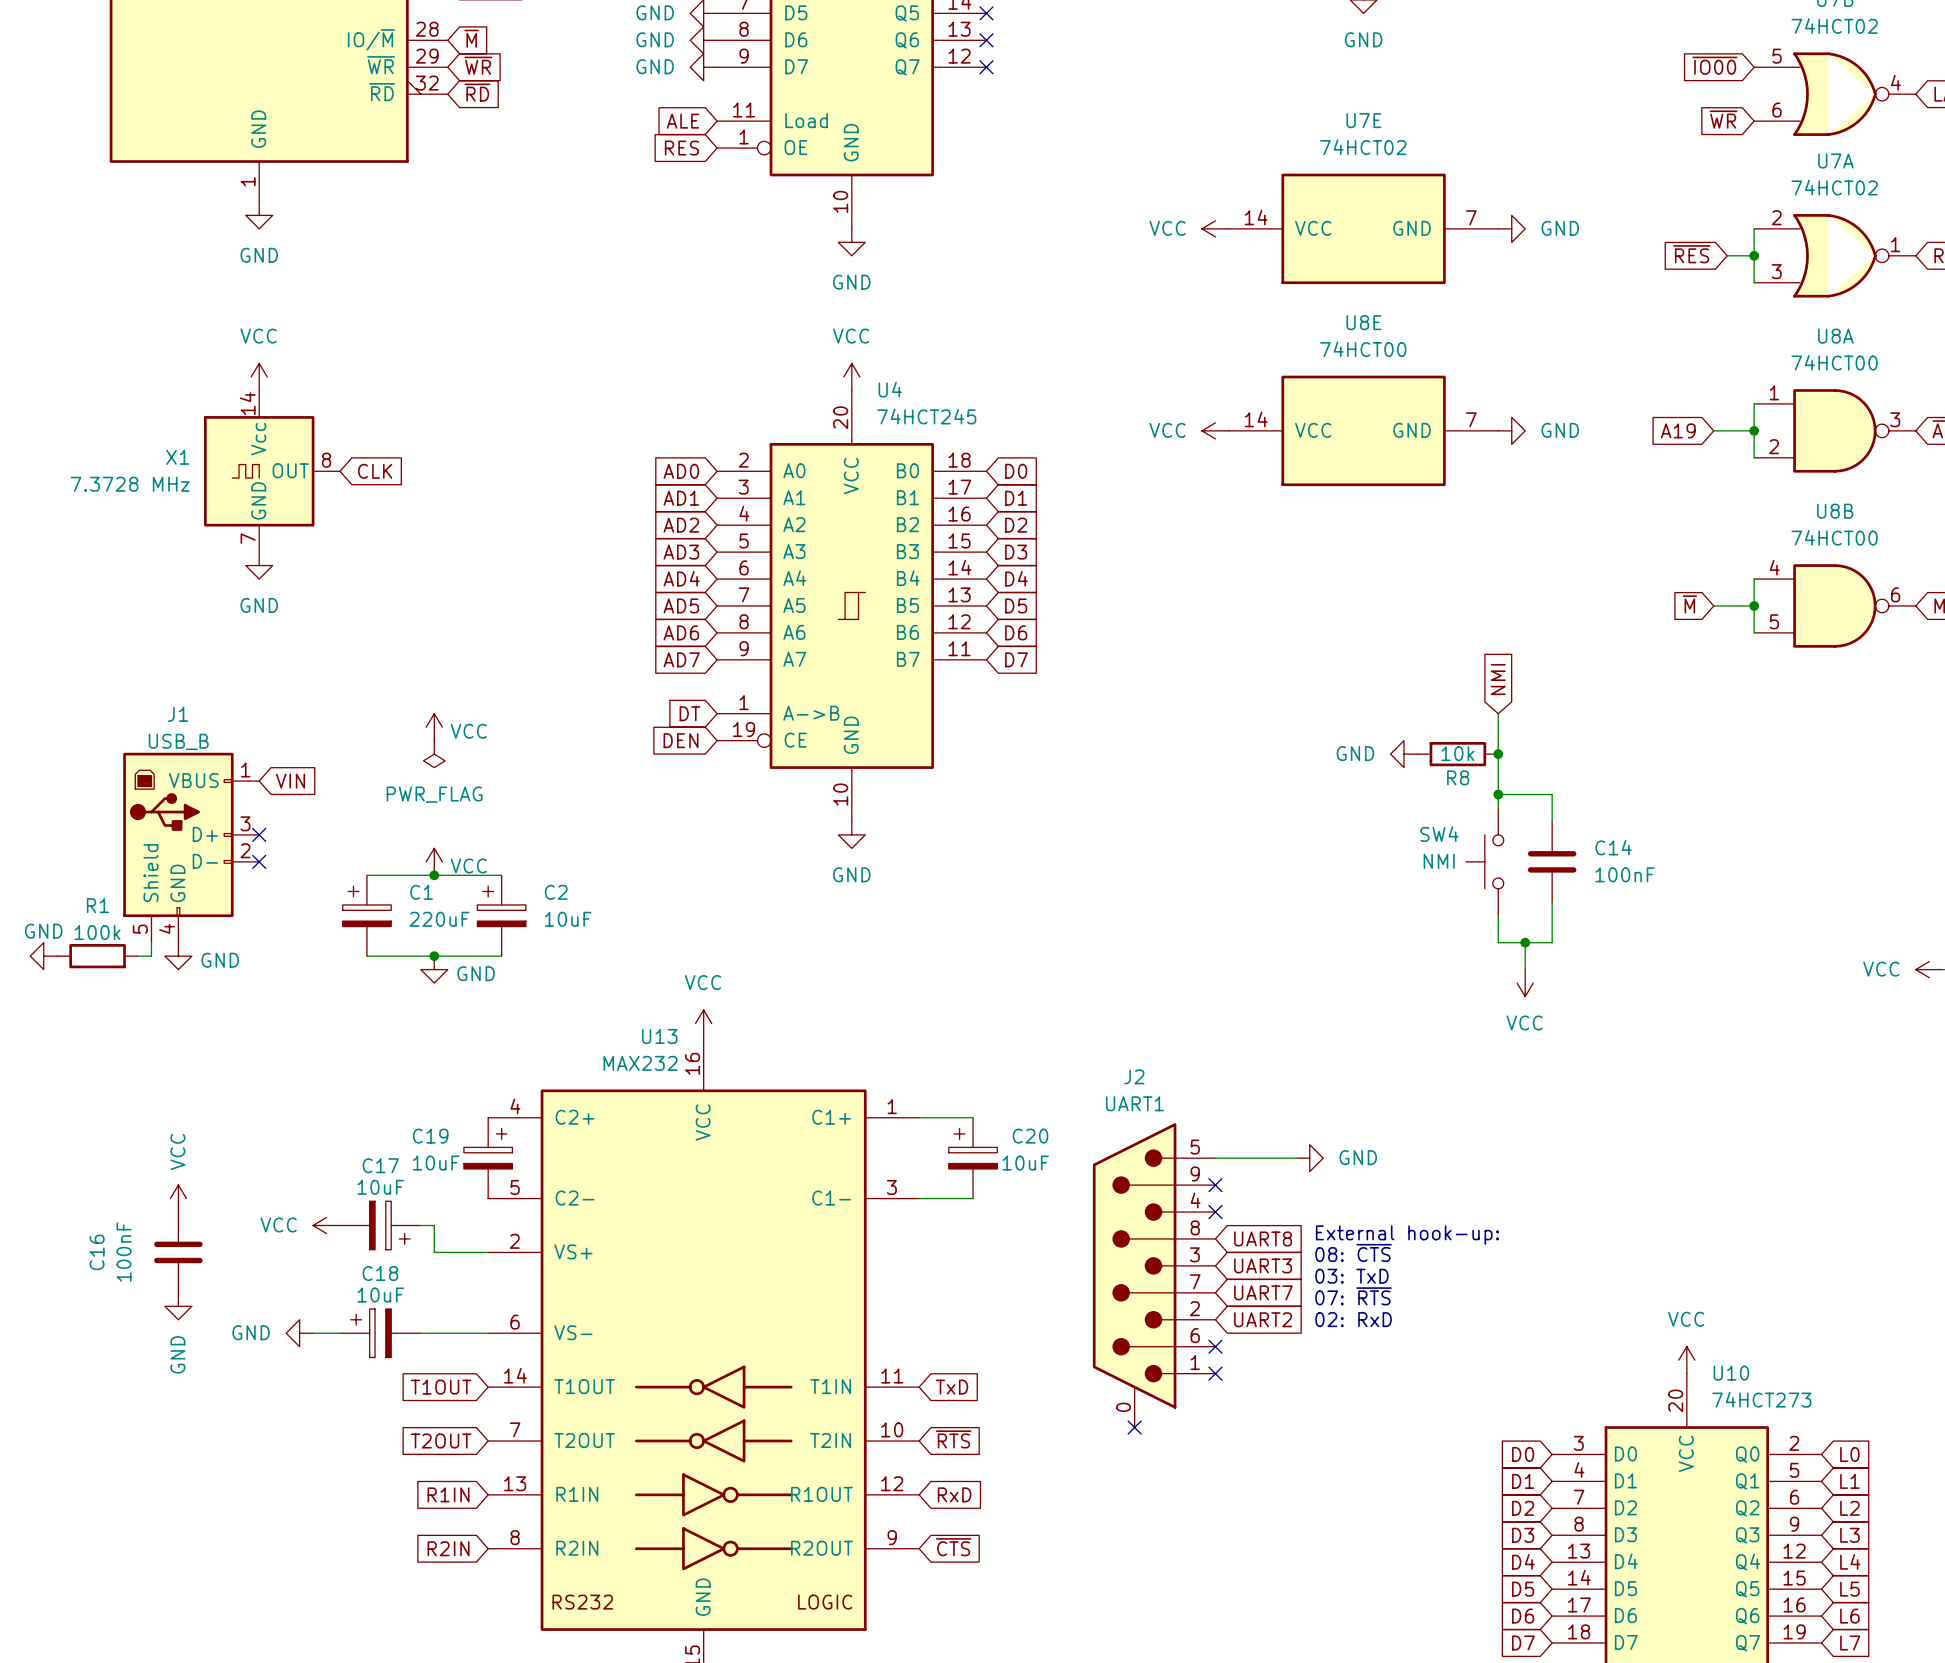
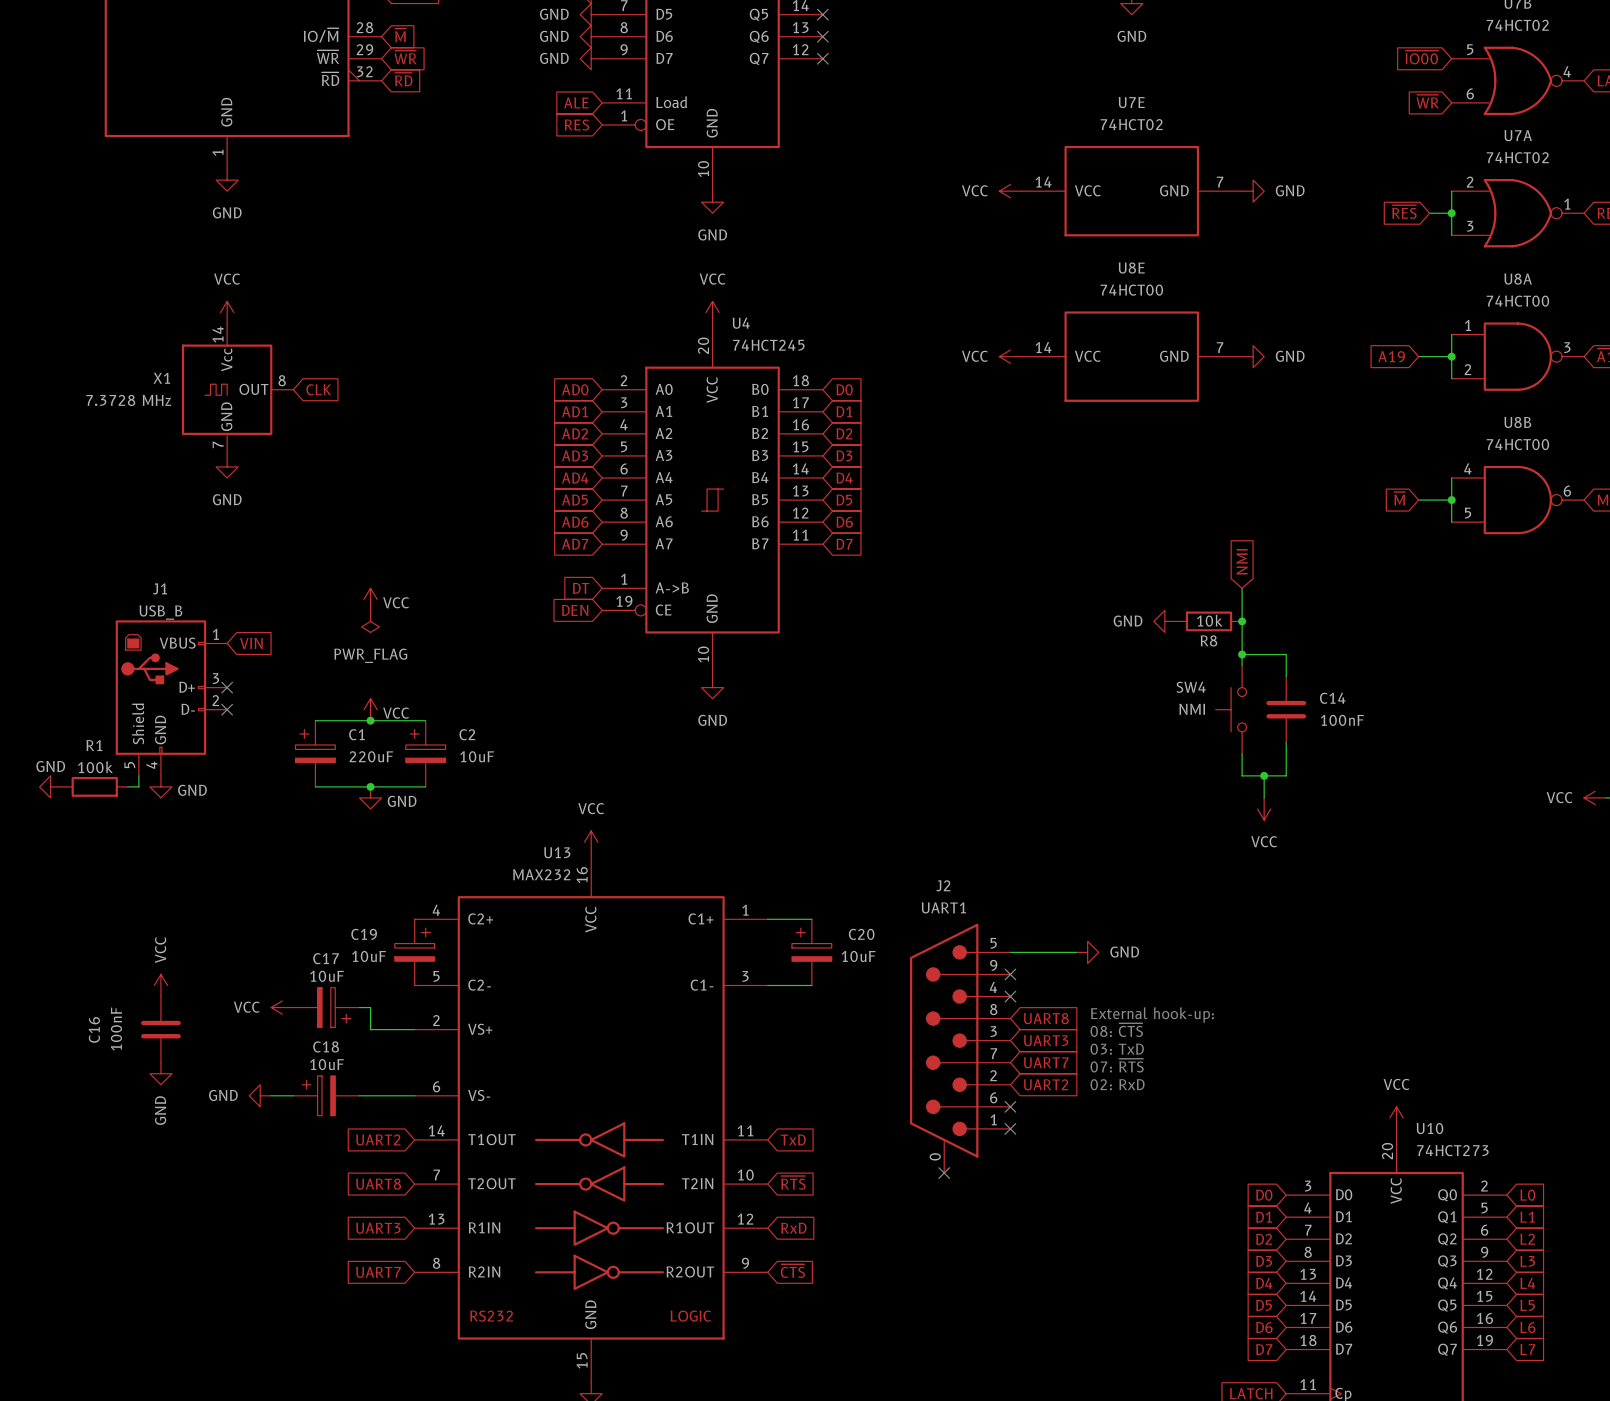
global label: T1OUT (441, 1387) -> UART2 (378, 1140)
global label: T2OUT (441, 1440) -> UART8 (378, 1184)
global label: R1IN (448, 1494) -> UART3 (378, 1228)
global label: R2IN (448, 1548) -> UART7 (378, 1272)

